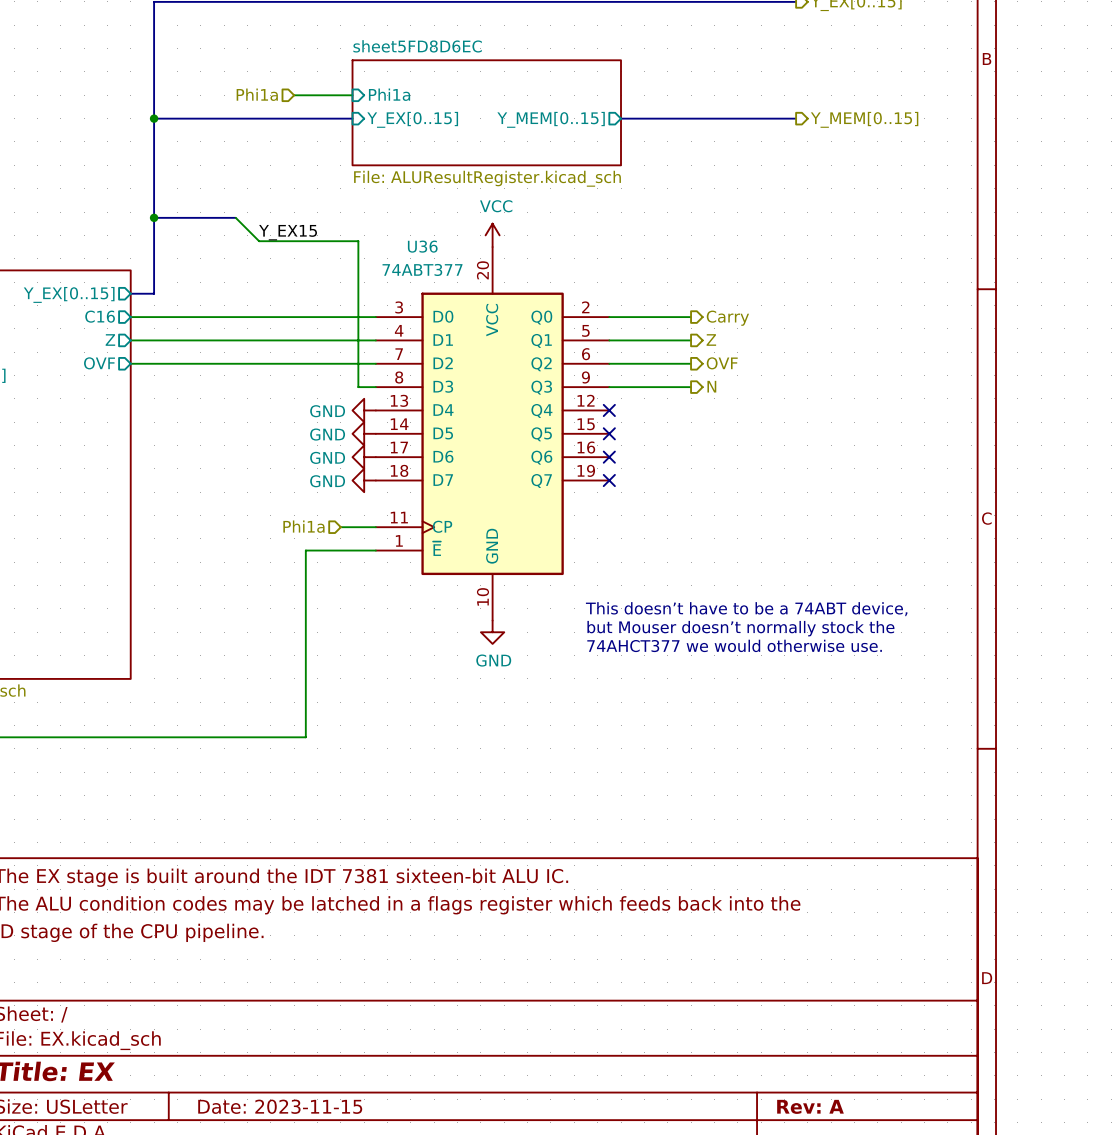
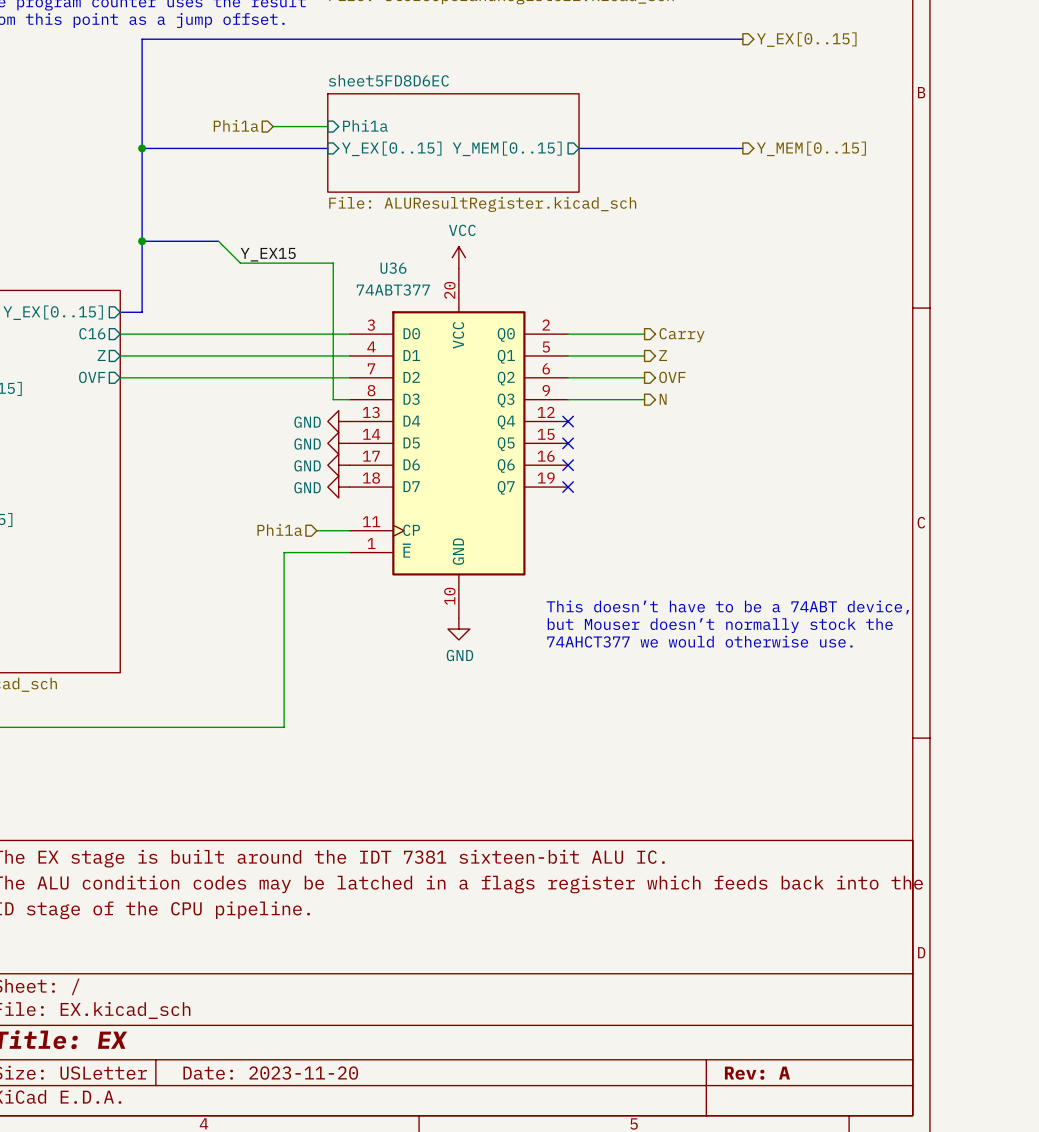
title block: Date: 2023-11-15 (280, 1106) -> Date: 2023-11-20 (270, 1073)

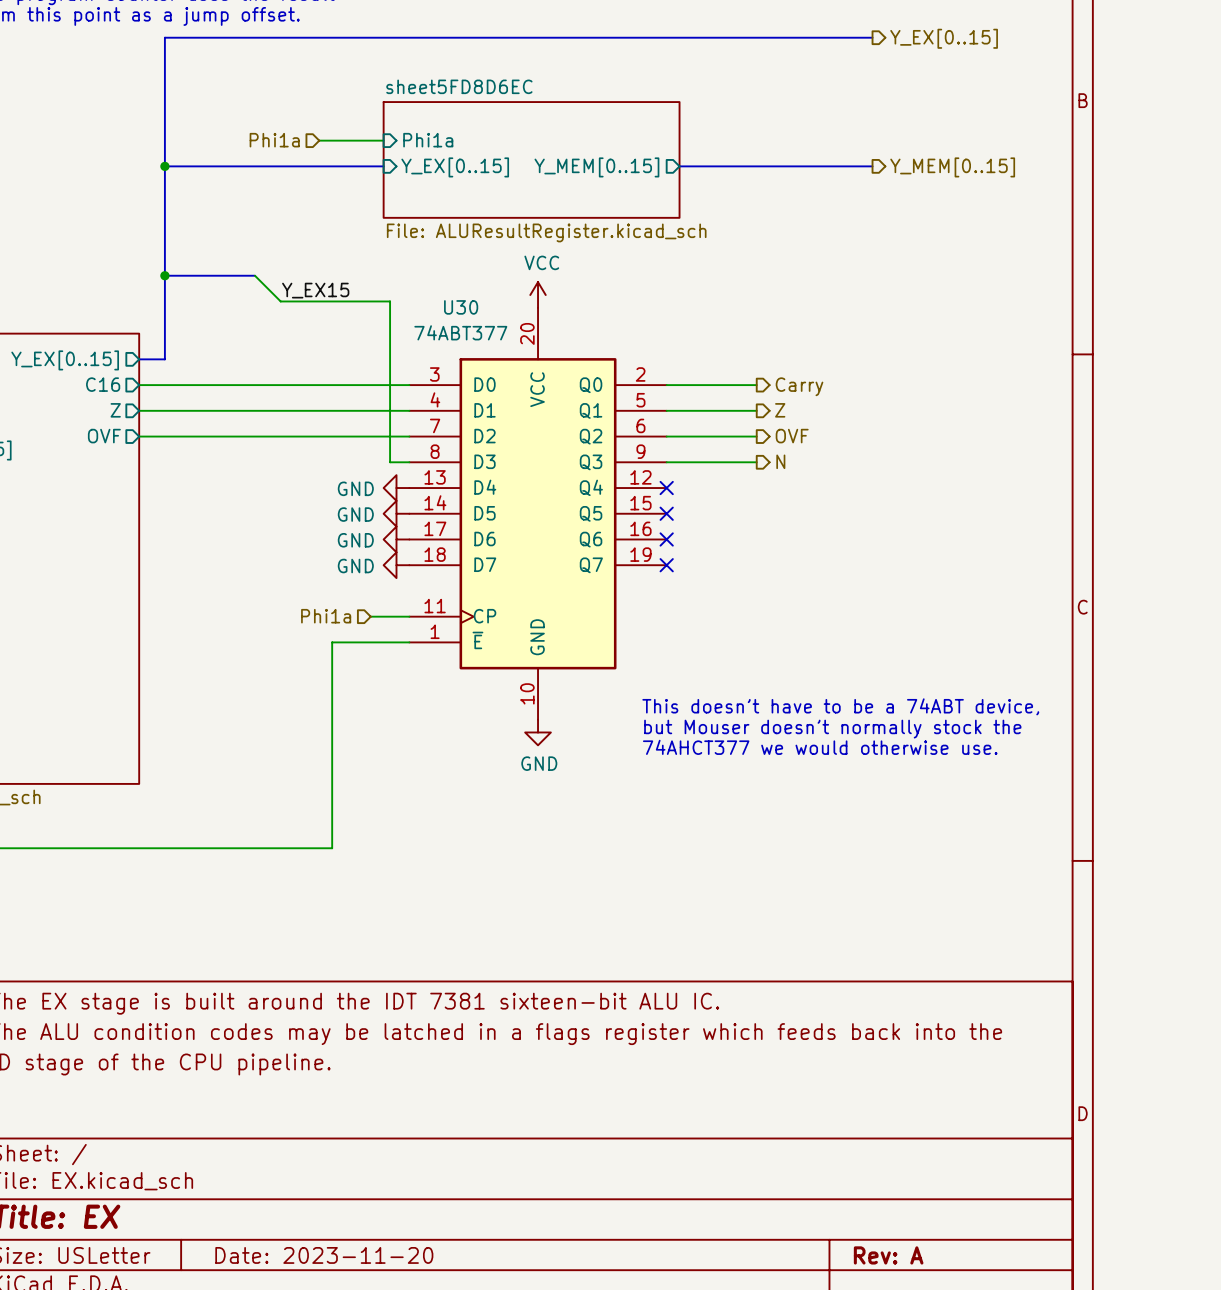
U36 name: U36 (393, 268) -> U30 (461, 307)

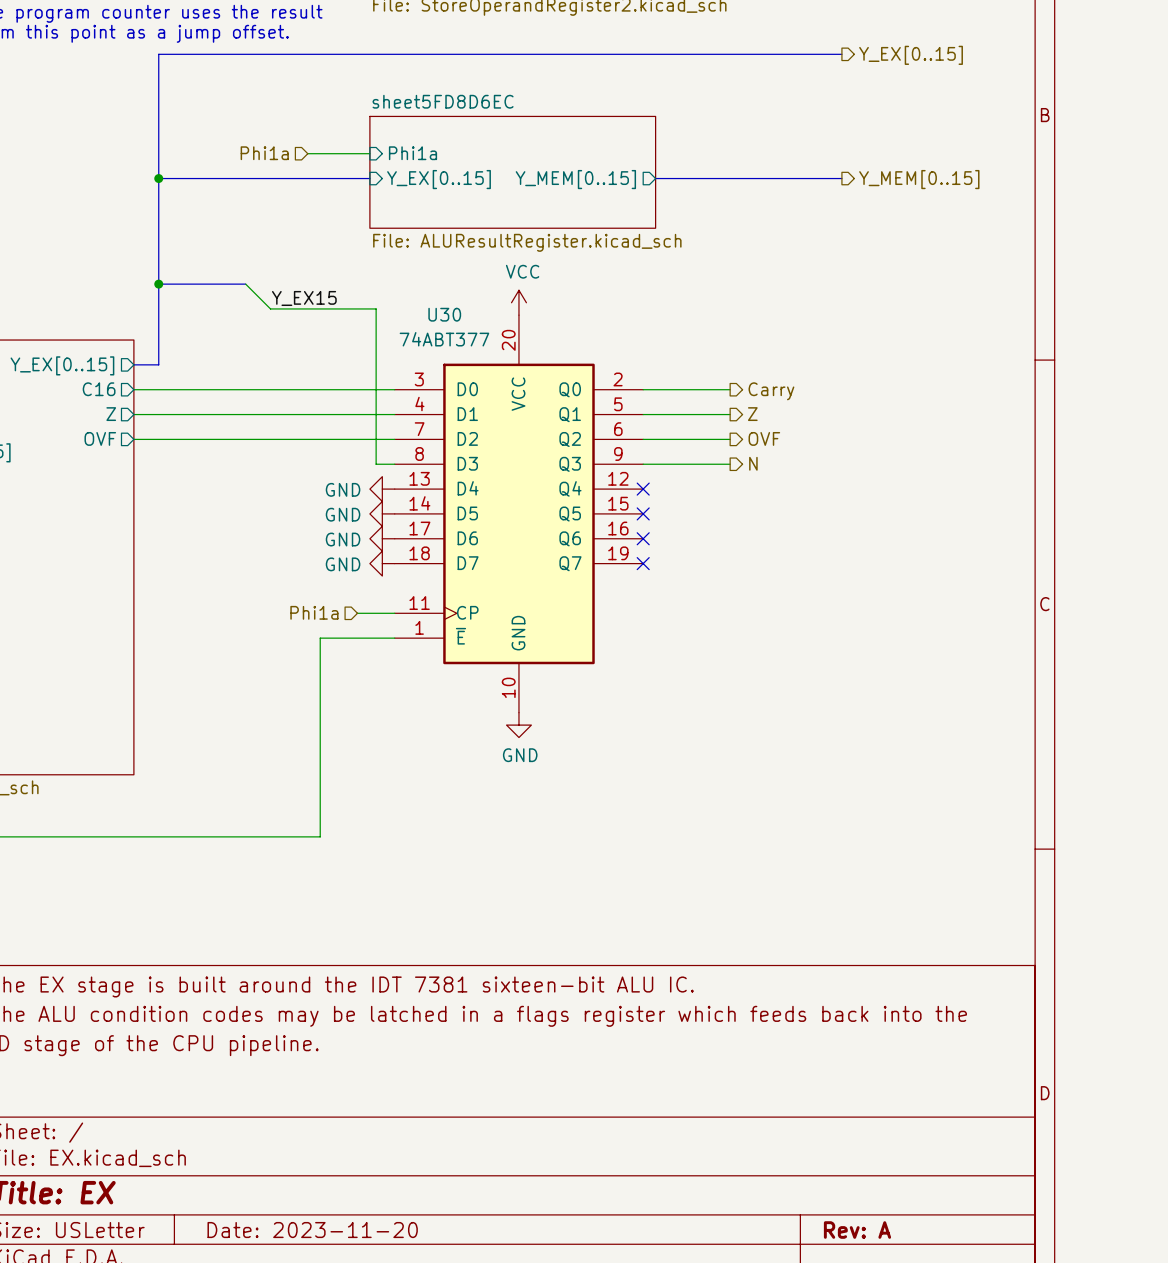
text: This doesn’t have to be a 74ABT device, (840, 706) -> none
text: but Mouser doesn’t normally stock the (832, 729) -> none
text: 74AHCT377 we would otherwise use. (820, 747) -> none

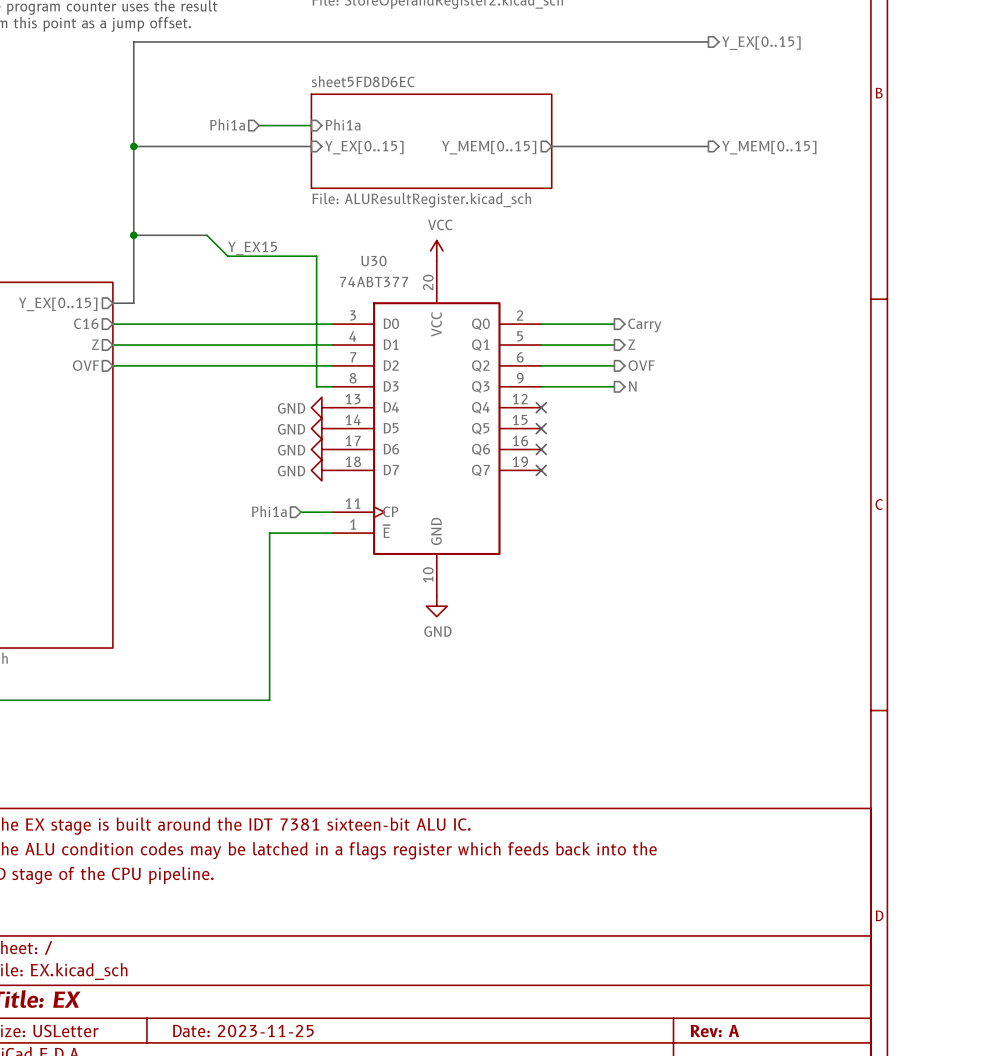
title block: Date: 2023-11-20 (312, 1230) -> Date: 2023-11-25 (243, 1031)

